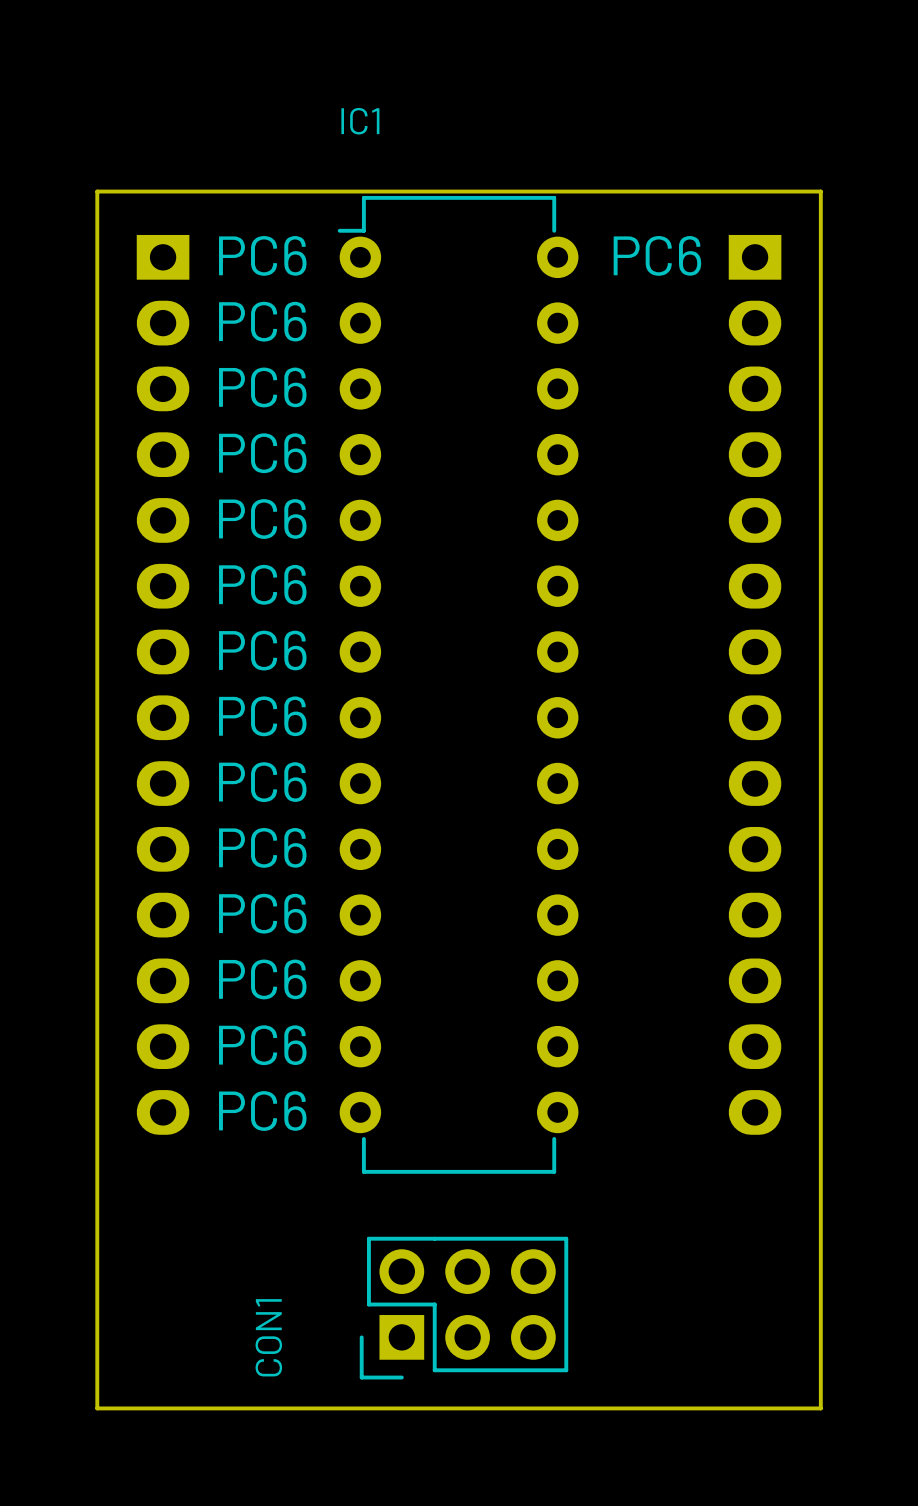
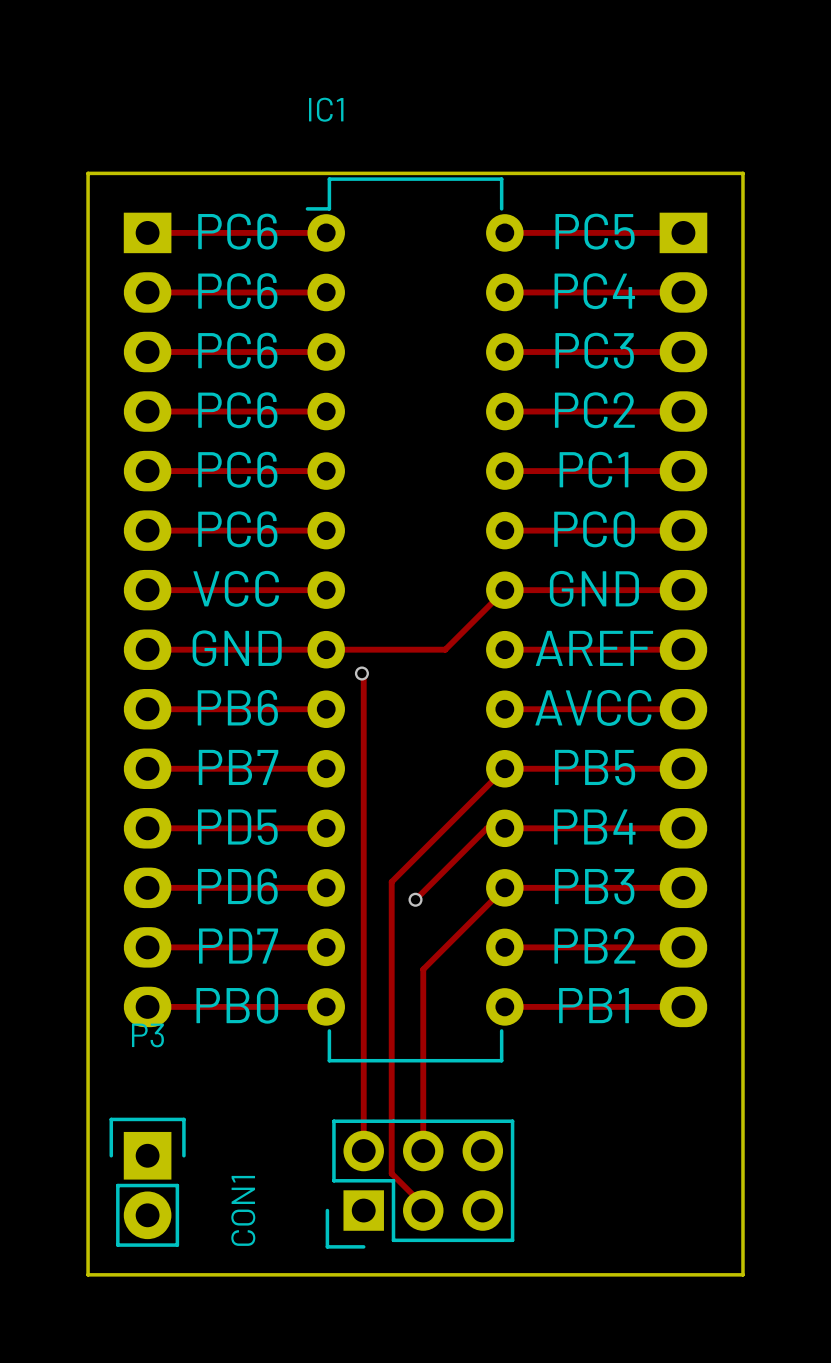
text: PC6 (657, 255) -> PC5 (595, 231)
track: none -> (147, 232) (326, 232)
track: none -> (504, 232) (683, 232)
text: none -> PC4 (594, 291)
track: none -> (147, 292) (326, 292)
track: none -> (504, 292) (683, 292)
text: none -> PC3 (594, 350)
track: none -> (147, 352) (326, 352)
track: none -> (504, 352) (683, 352)
text: none -> PC2 (594, 410)
track: none -> (147, 411) (326, 411)
track: none -> (504, 411) (683, 411)
text: none -> PC1 (593, 469)
track: none -> (147, 471) (326, 471)
track: none -> (504, 471) (683, 471)
text: none -> PC0 (594, 529)
track: none -> (147, 530) (326, 530)
track: none -> (504, 530) (683, 530)
text: PC6 (262, 650) -> VCC (236, 588)
text: none -> GND (594, 588)
track: none -> (147, 590) (326, 590)
track: none -> (683, 590) (504, 590) (445, 649) (147, 649)
text: PC6 (262, 716) -> GND (237, 648)
text: none -> AREF (594, 648)
track: none -> (504, 649) (683, 649)
track: none -> (361, 673) (363, 675) (363, 1151)
via: none -> (361, 673)
text: PC6 (262, 782) -> PB6 (237, 707)
text: none -> AVCC (593, 707)
track: none -> (147, 709) (326, 709)
track: none -> (504, 709) (683, 709)
text: PC6 (262, 847) -> PB7 (238, 767)
text: none -> PB5 (595, 767)
track: none -> (147, 768) (326, 768)
track: none -> (683, 768) (504, 768) (391, 881) (391, 1173) (423, 1205) (423, 1210)
text: PC6 (262, 913) -> PD5 (237, 827)
text: none -> PB4 (594, 826)
track: none -> (147, 828) (326, 828)
track: none -> (683, 828) (486, 828) (415, 899)
text: PC6 (262, 979) -> PD6 (237, 886)
text: none -> PB3 (594, 886)
track: none -> (147, 887) (326, 887)
track: none -> (683, 887) (504, 887) (423, 969) (423, 1151)
via: none -> (415, 899)
text: none -> PB2 (594, 945)
text: PC6 (262, 1045) -> PD7 (238, 946)
track: none -> (147, 947) (326, 947)
track: none -> (504, 947) (683, 947)
text: none -> PB1 (593, 1005)
text: PC6 (262, 1111) -> PB0 (237, 1005)
track: none -> (147, 1006) (326, 1006)
track: none -> (504, 1006) (683, 1006)
P3: none -> (147, 1182)

